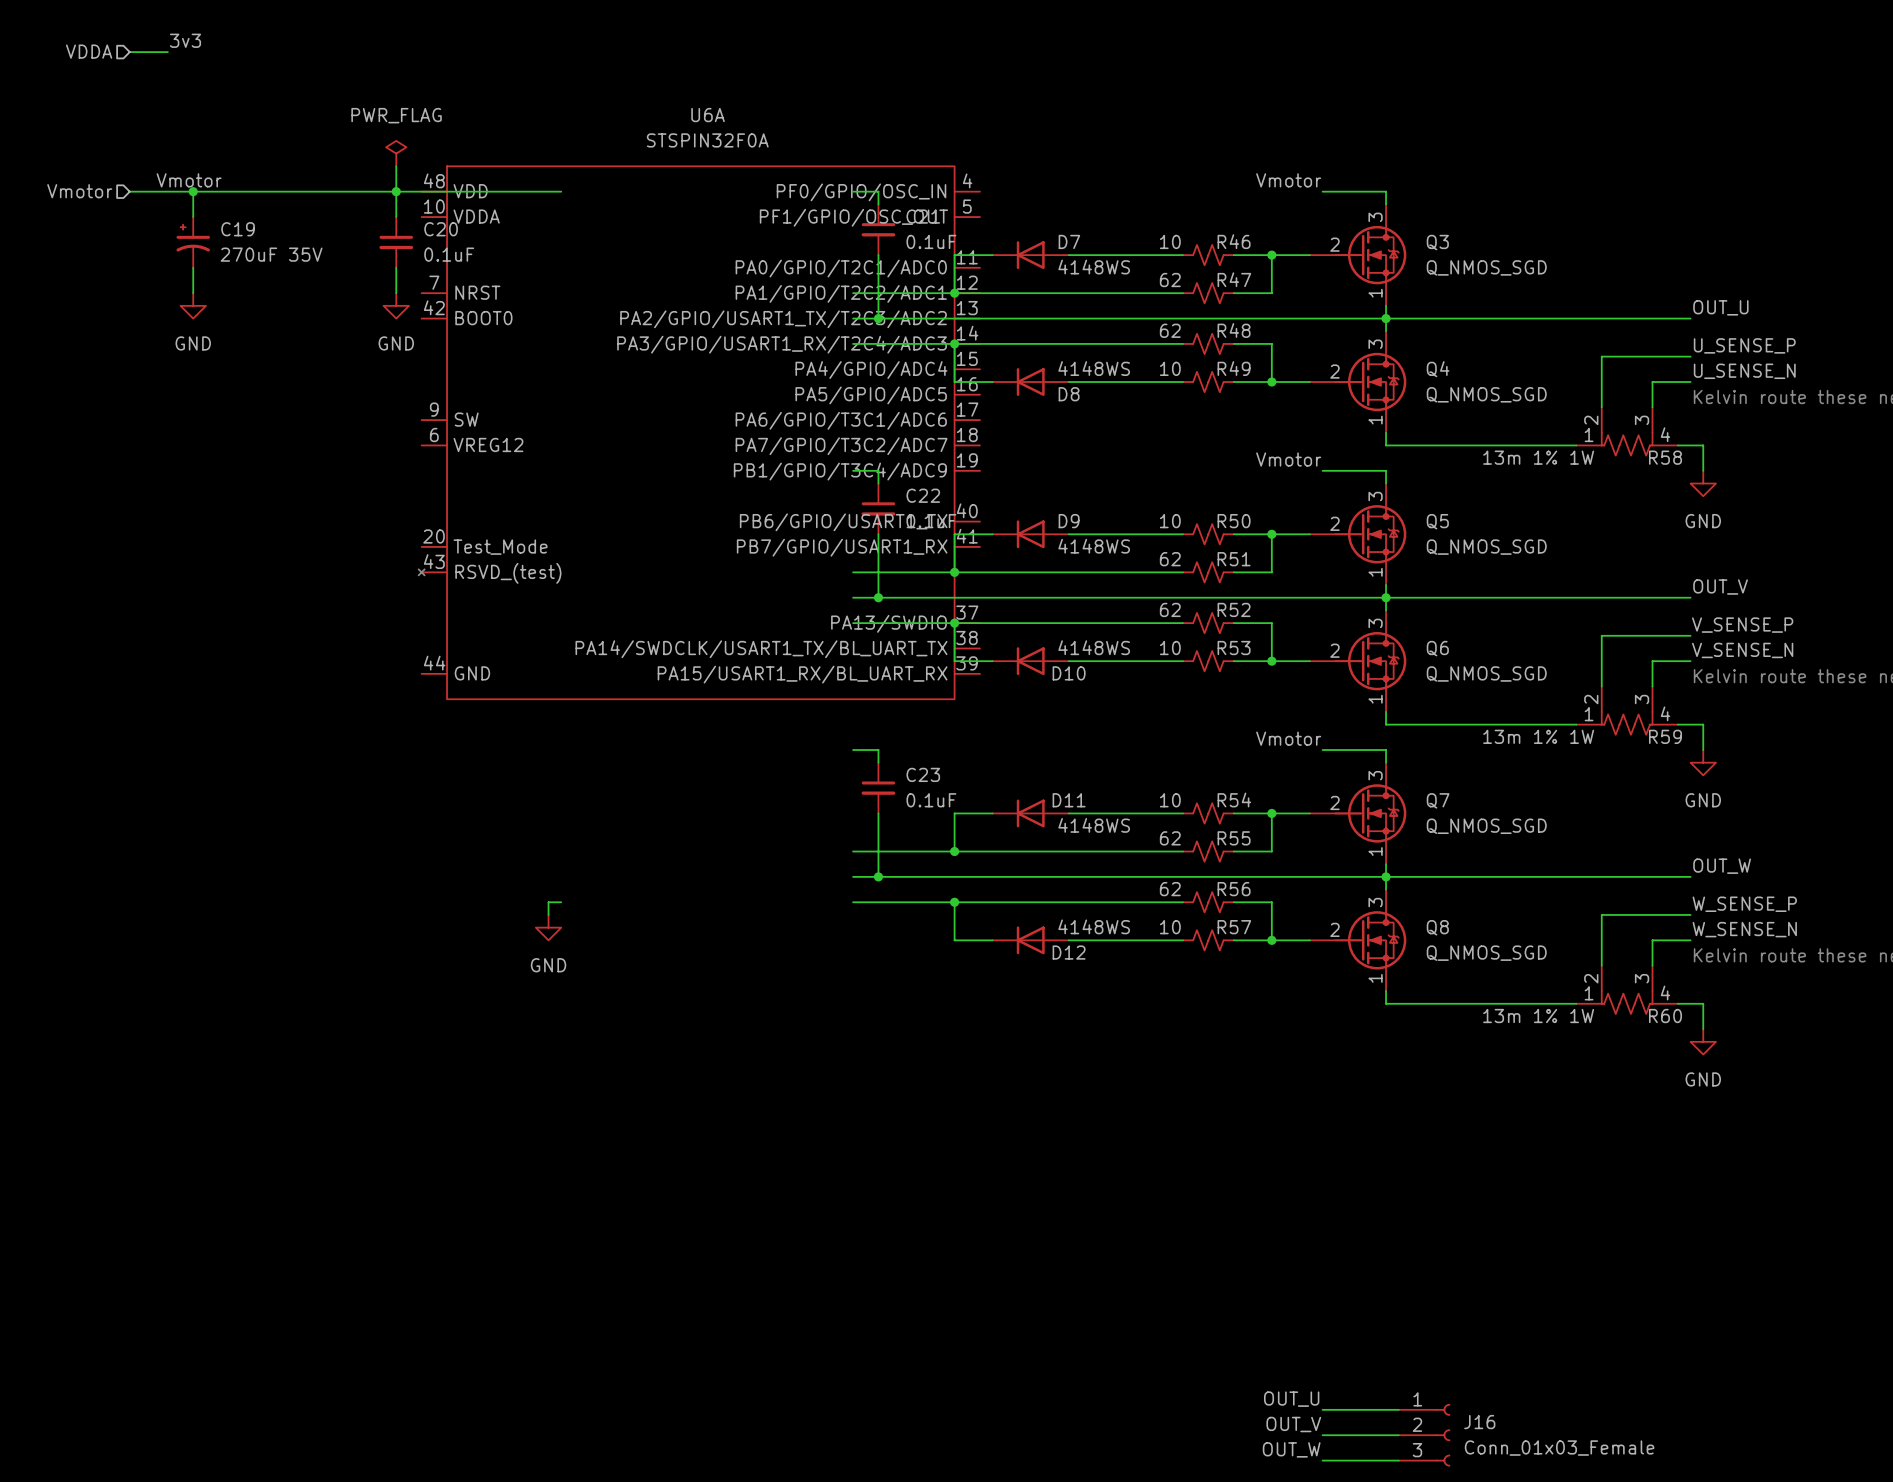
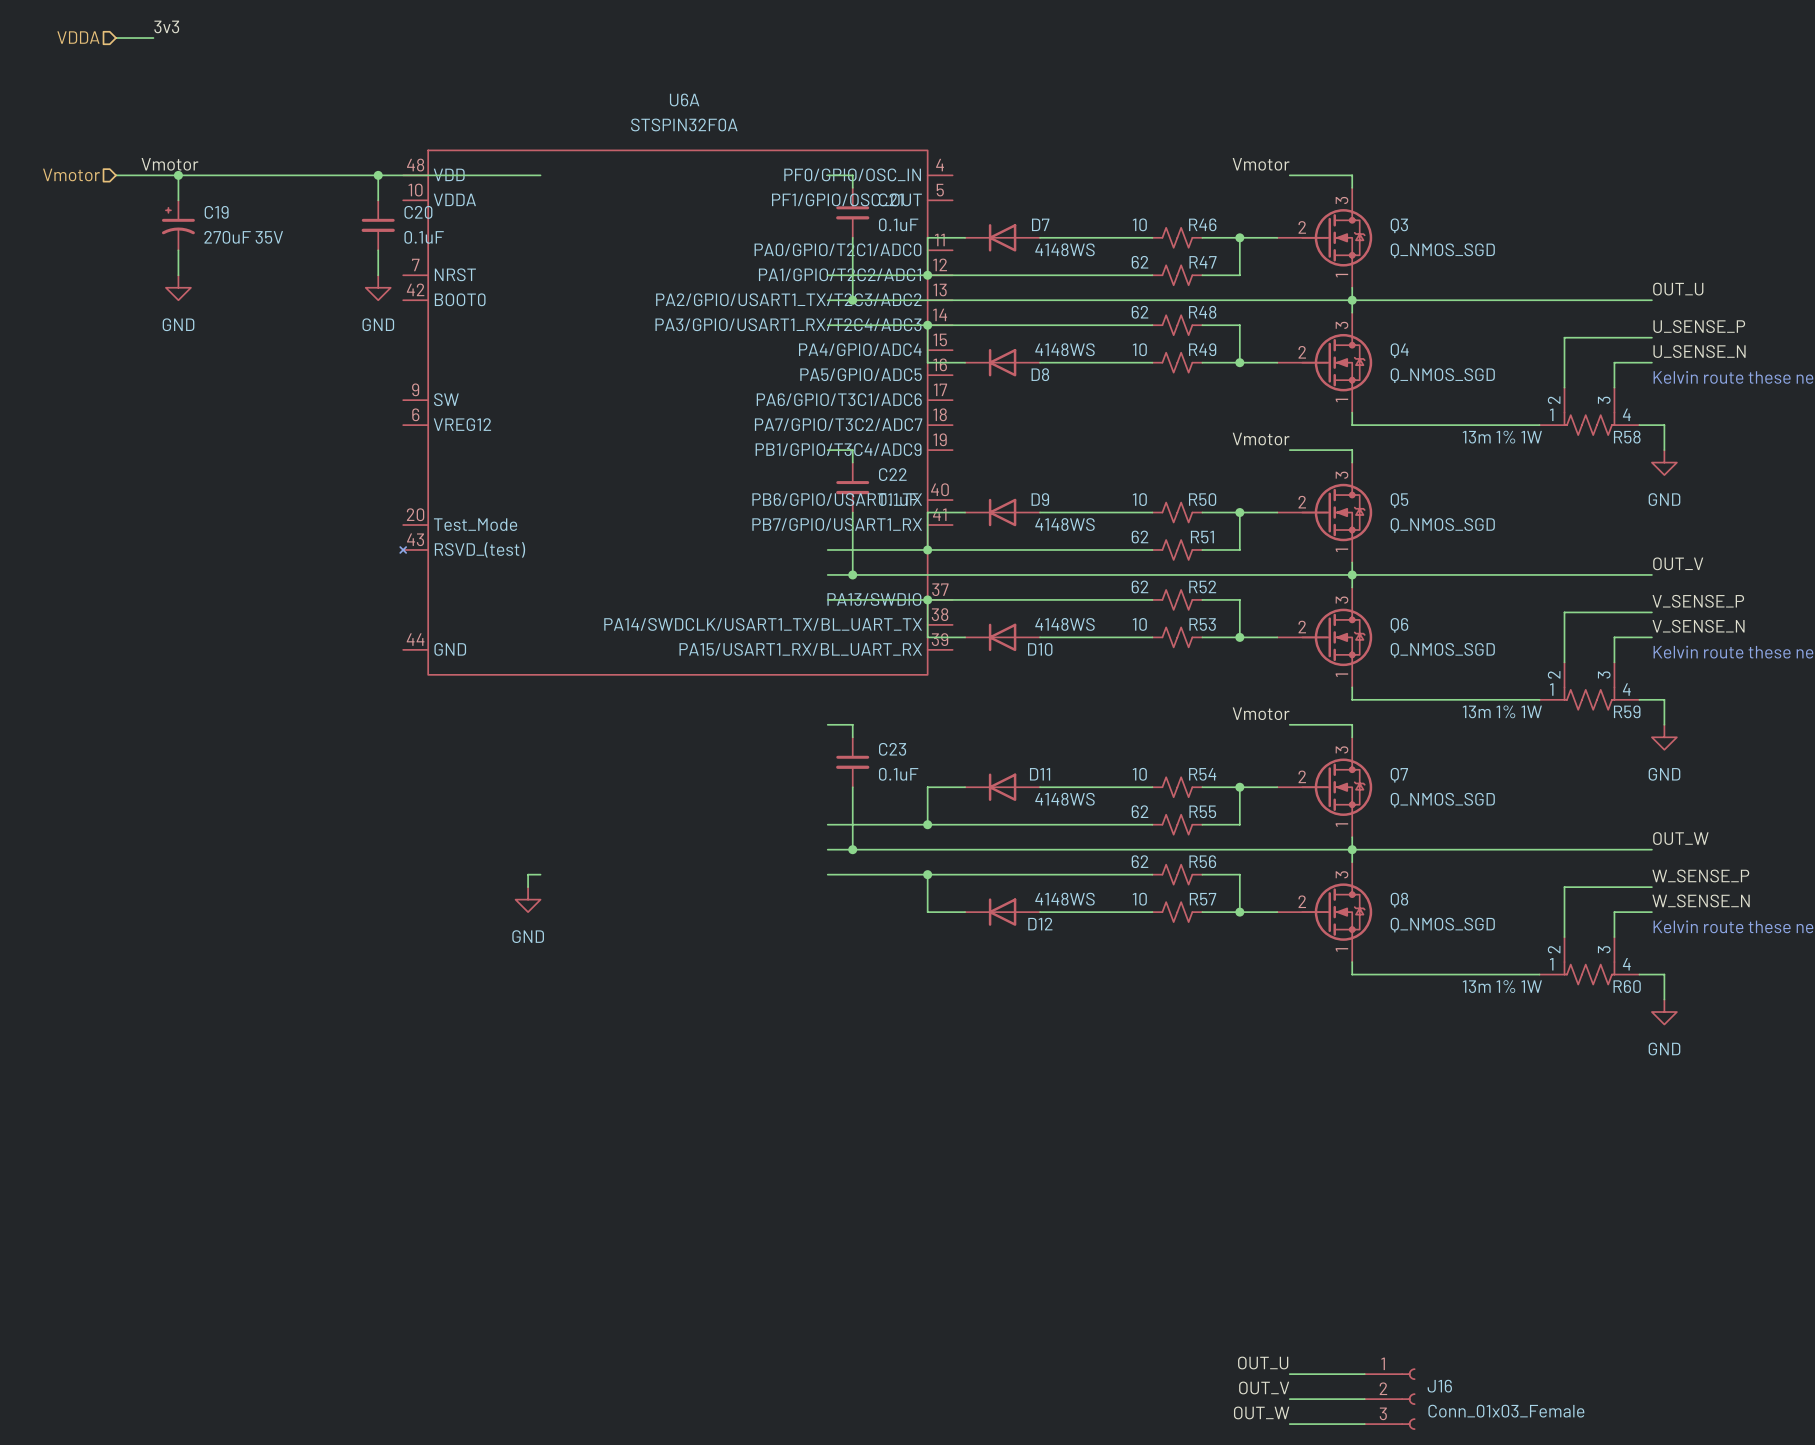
power symbol: PWR_FLAG (396, 153) -> none
wire: (396, 166) (396, 191) -> none

